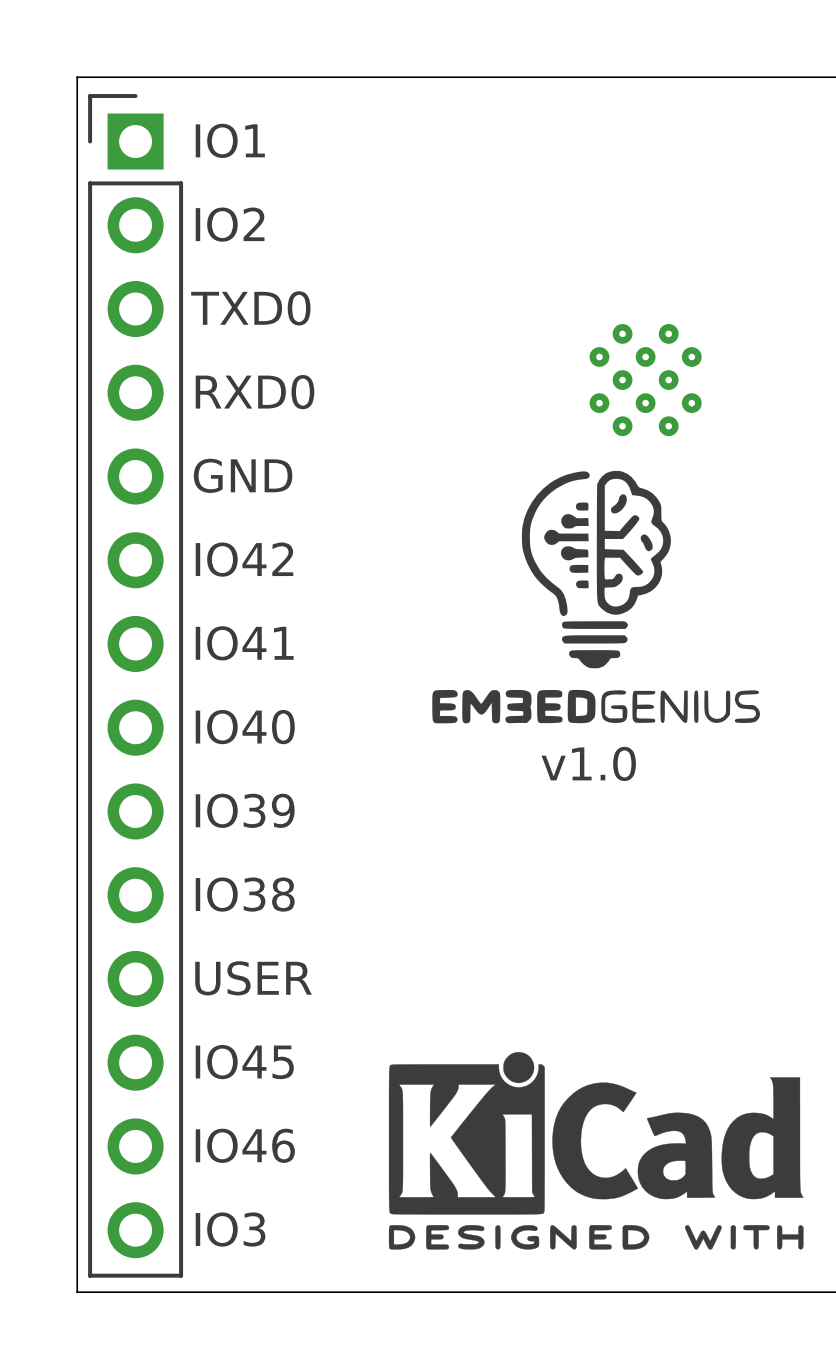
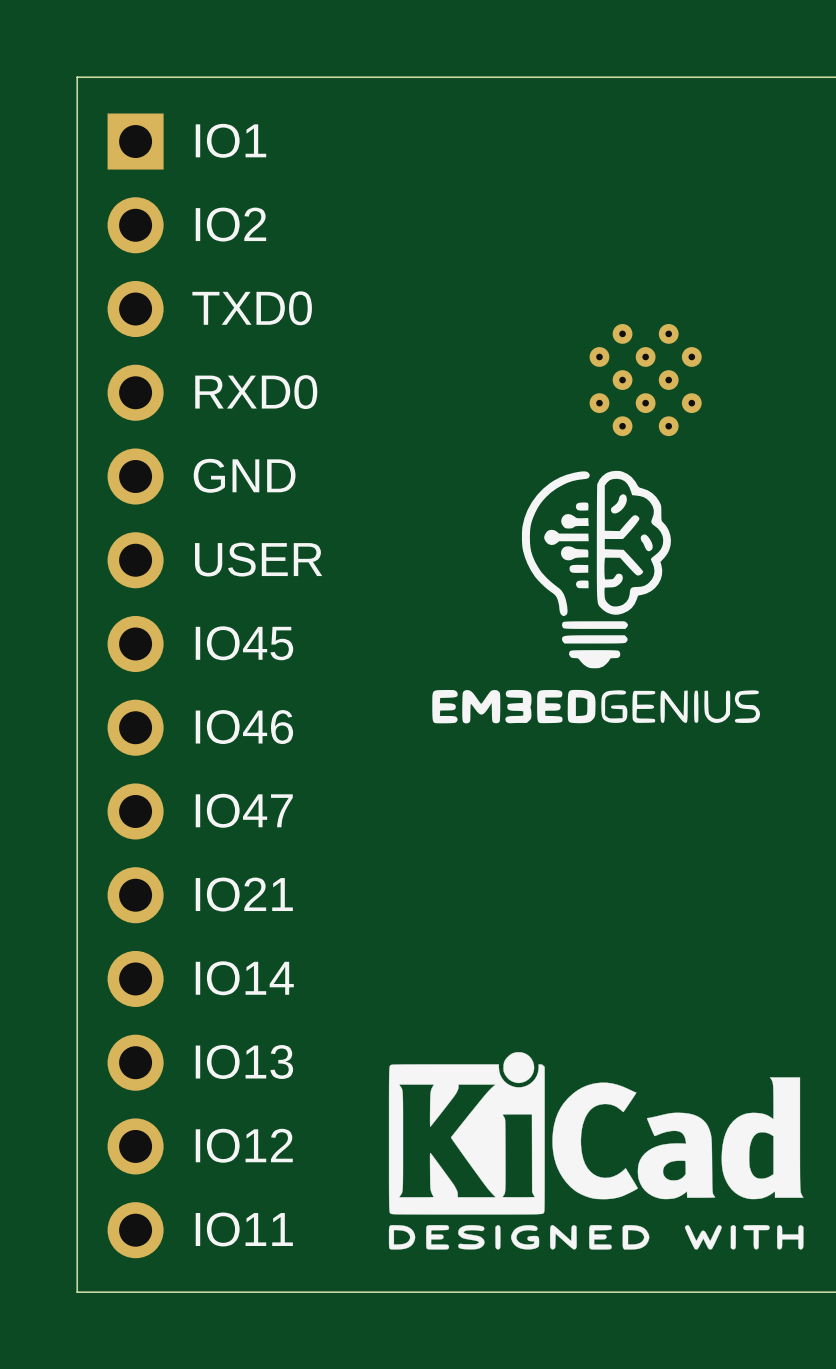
text: IO42 (244, 559) -> USER (258, 559)
text: IO41 (244, 643) -> IO45 (244, 643)
part side: bottom (135, 685) -> top (135, 685)
text: IO40 (245, 727) -> IO46 (244, 727)
text: v1.0 (588, 763) -> none
text: IO39 (245, 810) -> IO47 (244, 810)
text: IO38 (245, 894) -> IO21 (244, 894)
text: USER (253, 978) -> IO14 (244, 978)
text: IO45 (244, 1062) -> IO13 (244, 1062)
text: IO46 (245, 1145) -> IO12 (244, 1145)
text: IO3 (230, 1229) -> IO11 (244, 1229)

